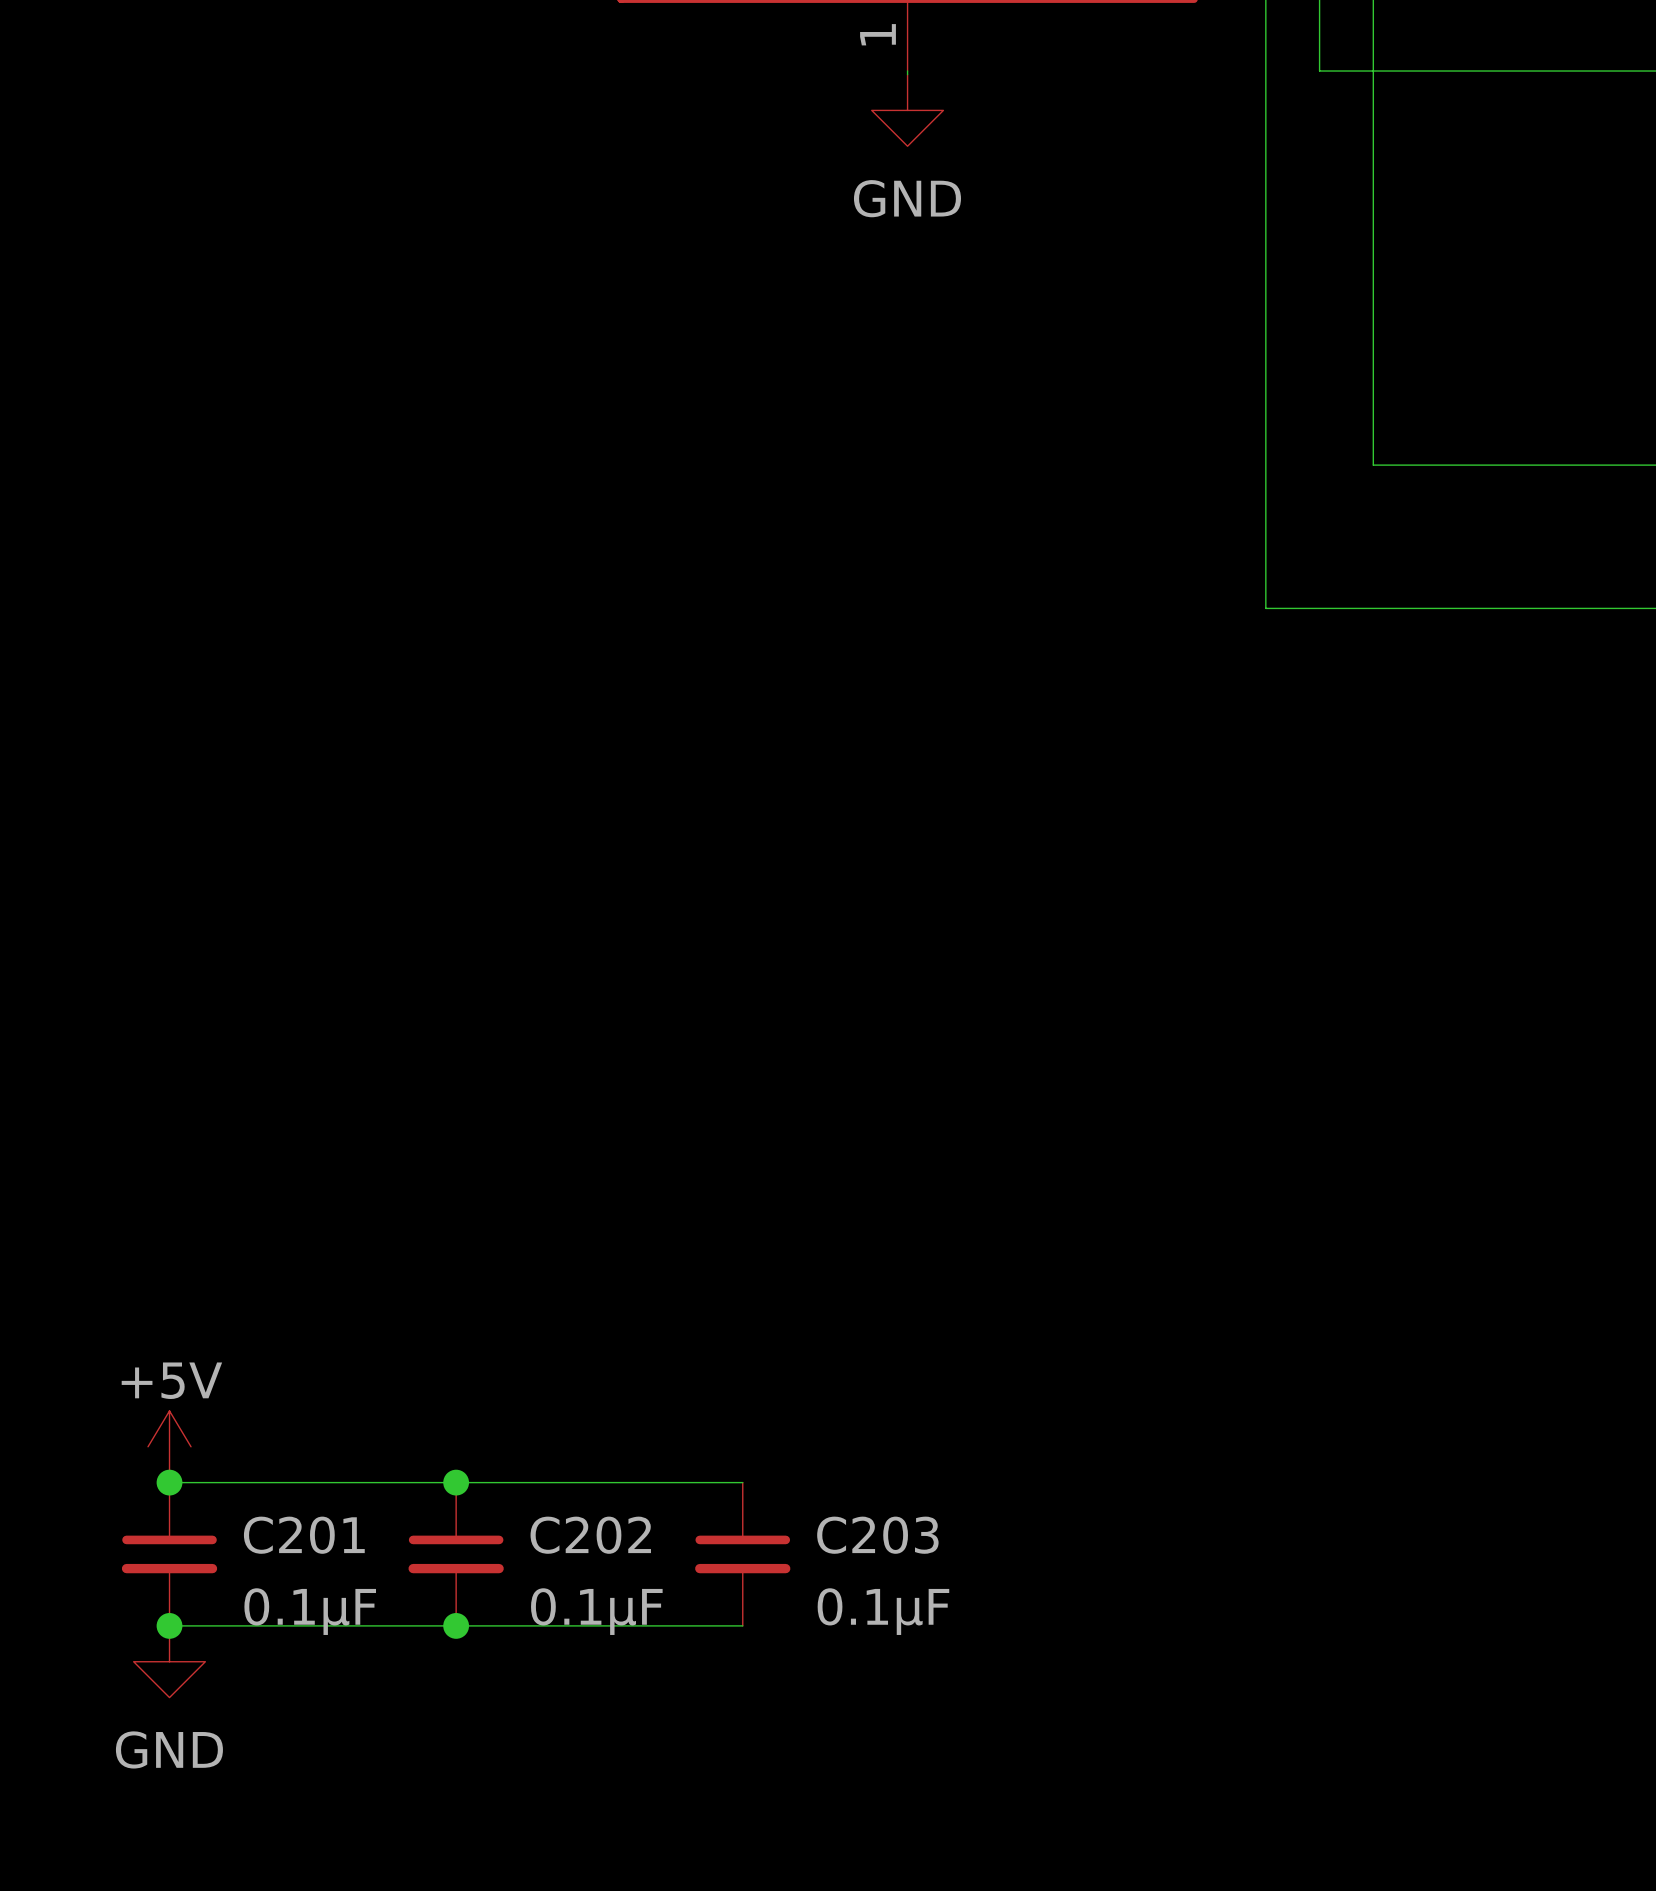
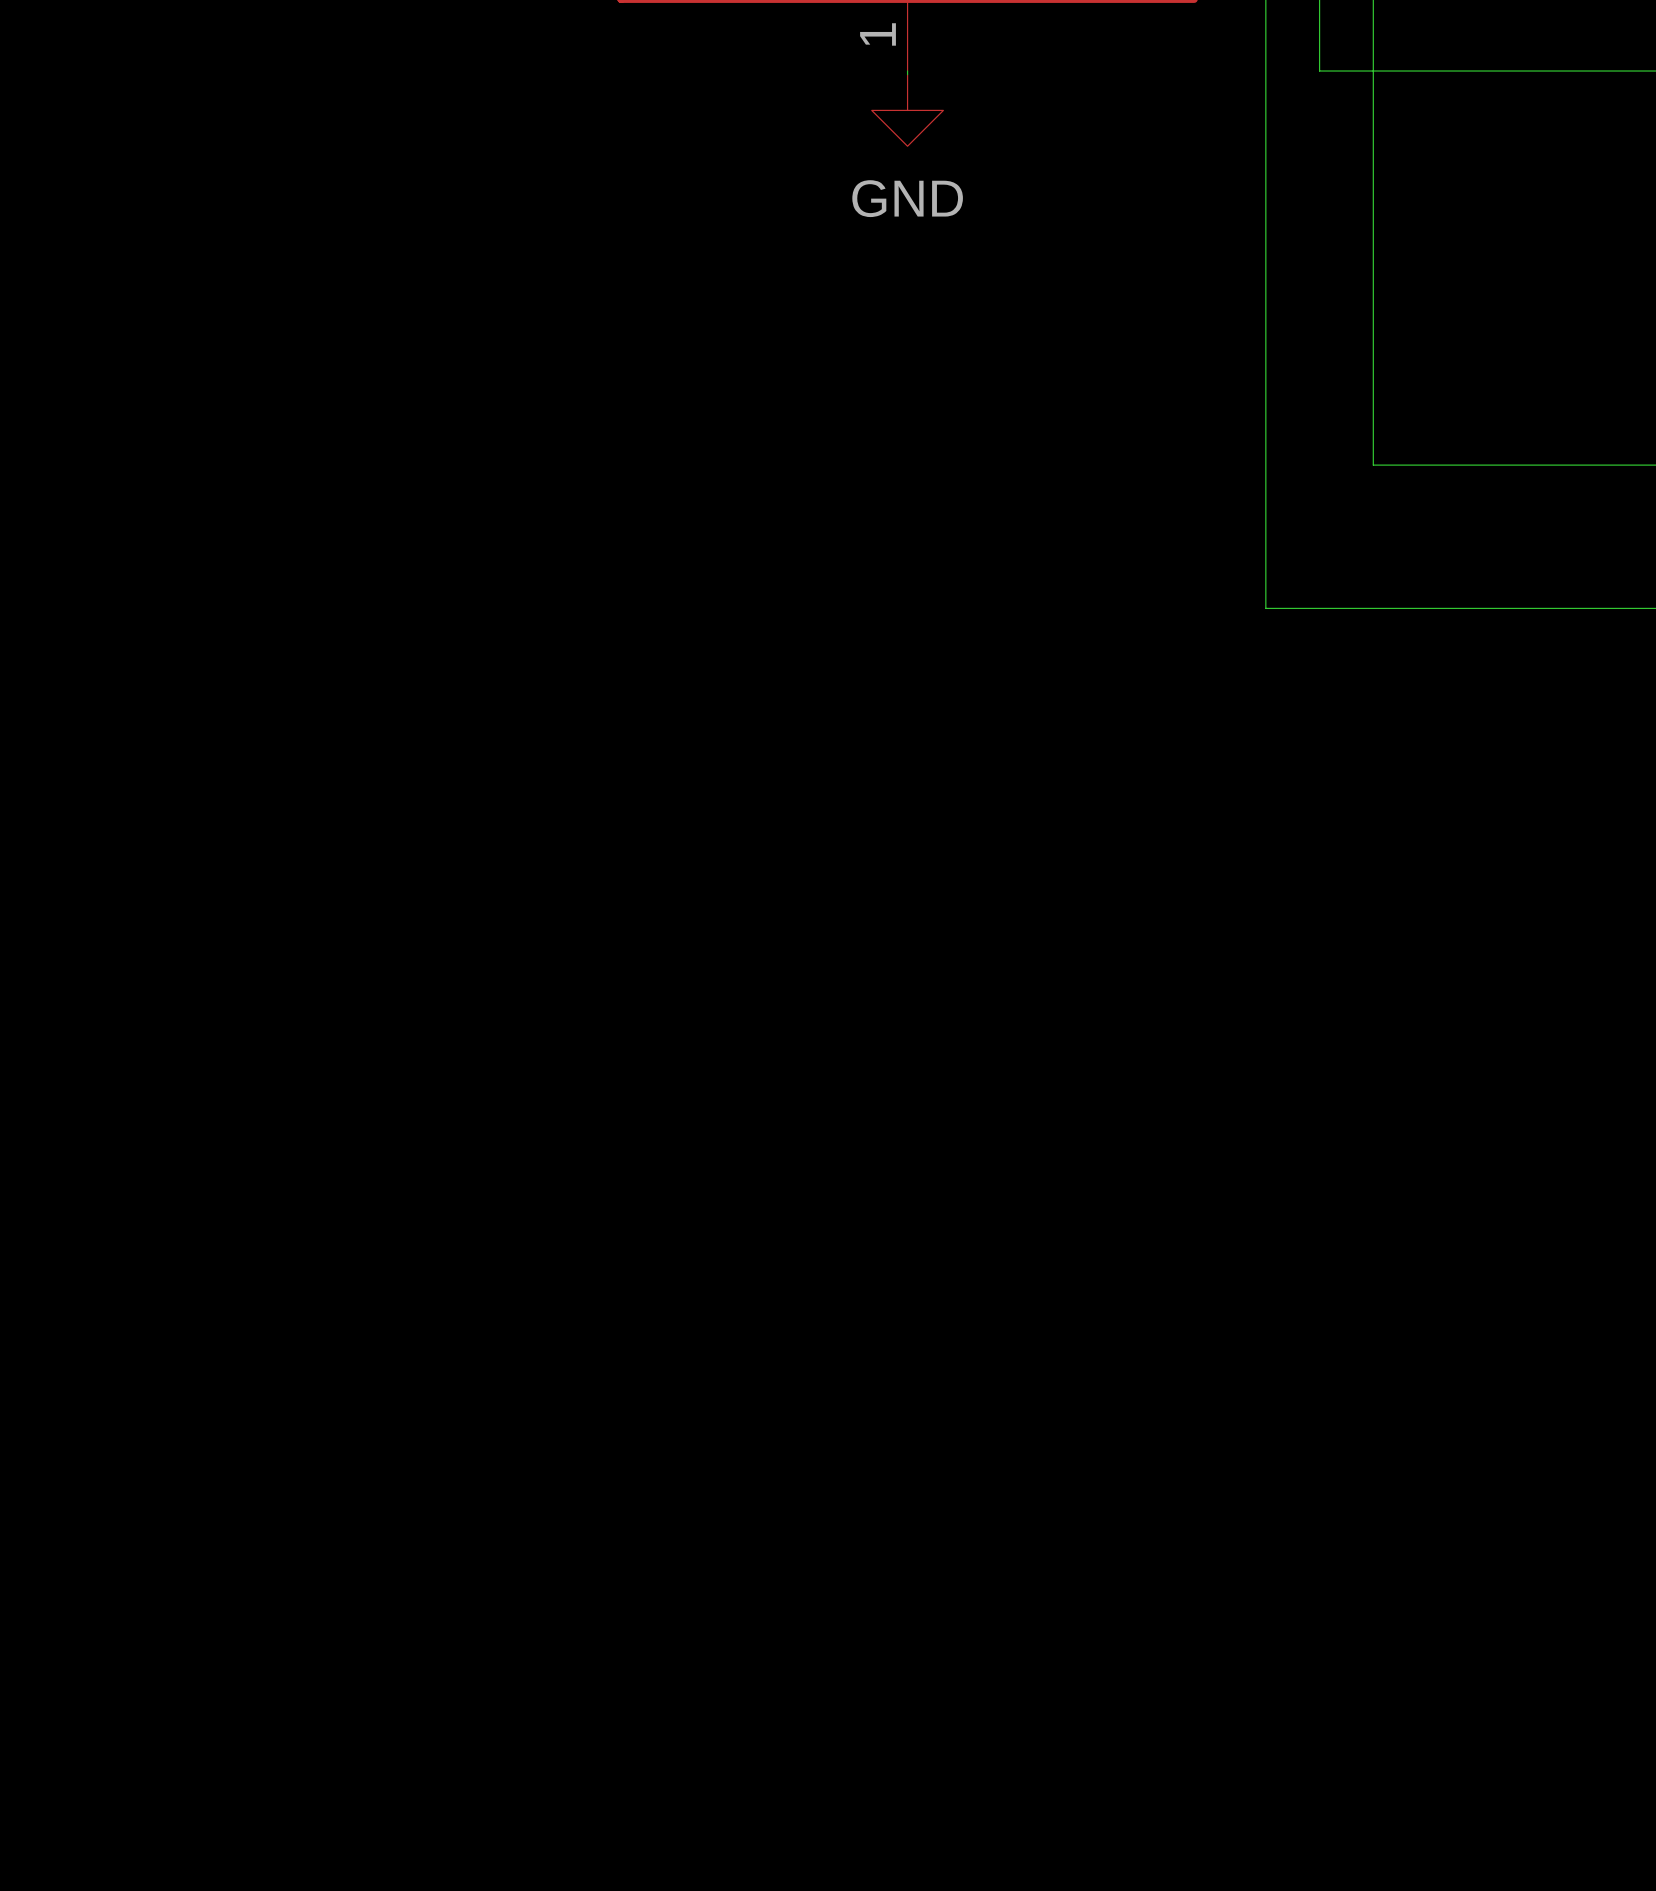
power symbol: +5V (169, 1446) -> none
wire: (169, 1482) (742, 1482) -> none
junction: (169, 1482) -> none
junction: (456, 1482) -> none
C201: 0.1µF (169, 1554) -> none
C202: 0.1µF (456, 1554) -> none
C203: 0.1µF (742, 1554) -> none
wire: (169, 1625) (742, 1625) -> none
junction: (169, 1625) -> none
junction: (456, 1625) -> none
power symbol: GND (169, 1661) -> none

